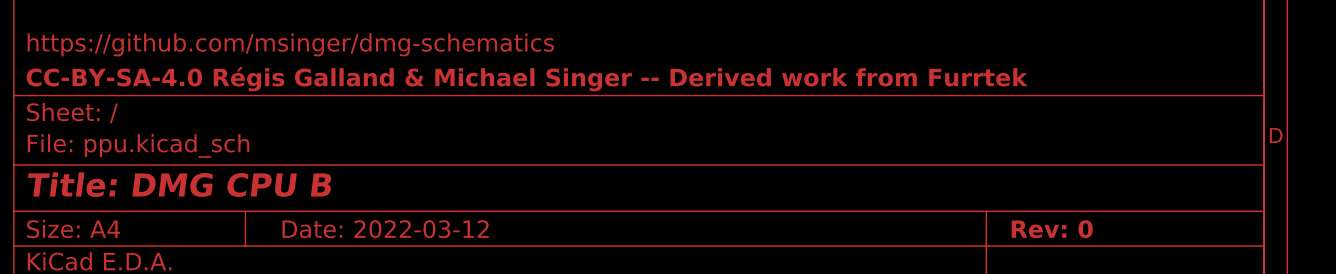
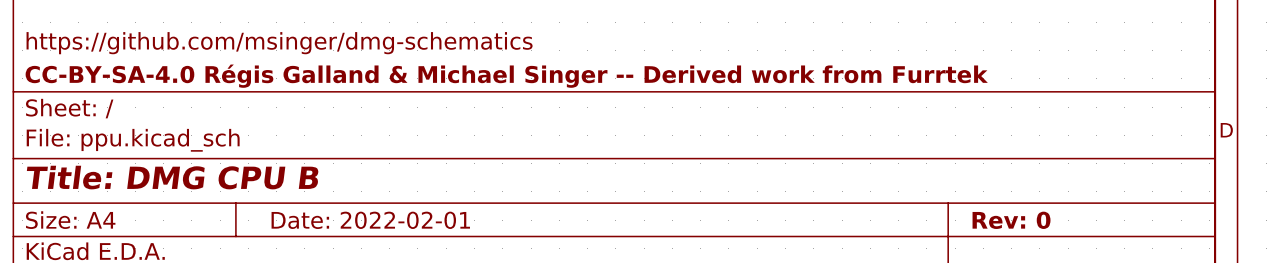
title block: Date: 2022-03-12 (385, 229) -> Date: 2022-02-01 (370, 220)

